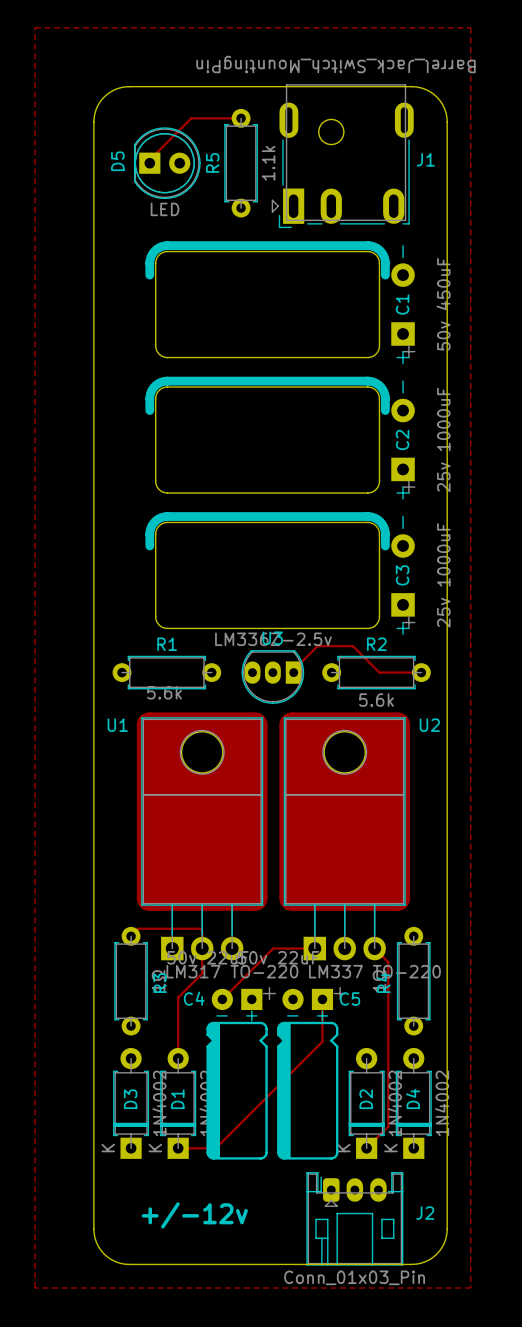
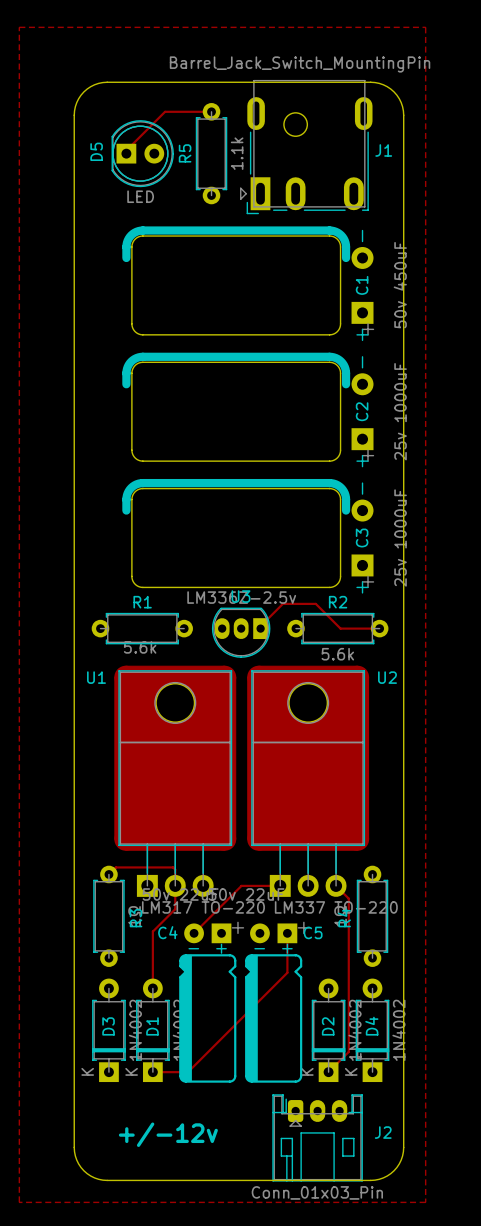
J1 value rotation: 0° (336, 64) -> 180° (300, 64)

